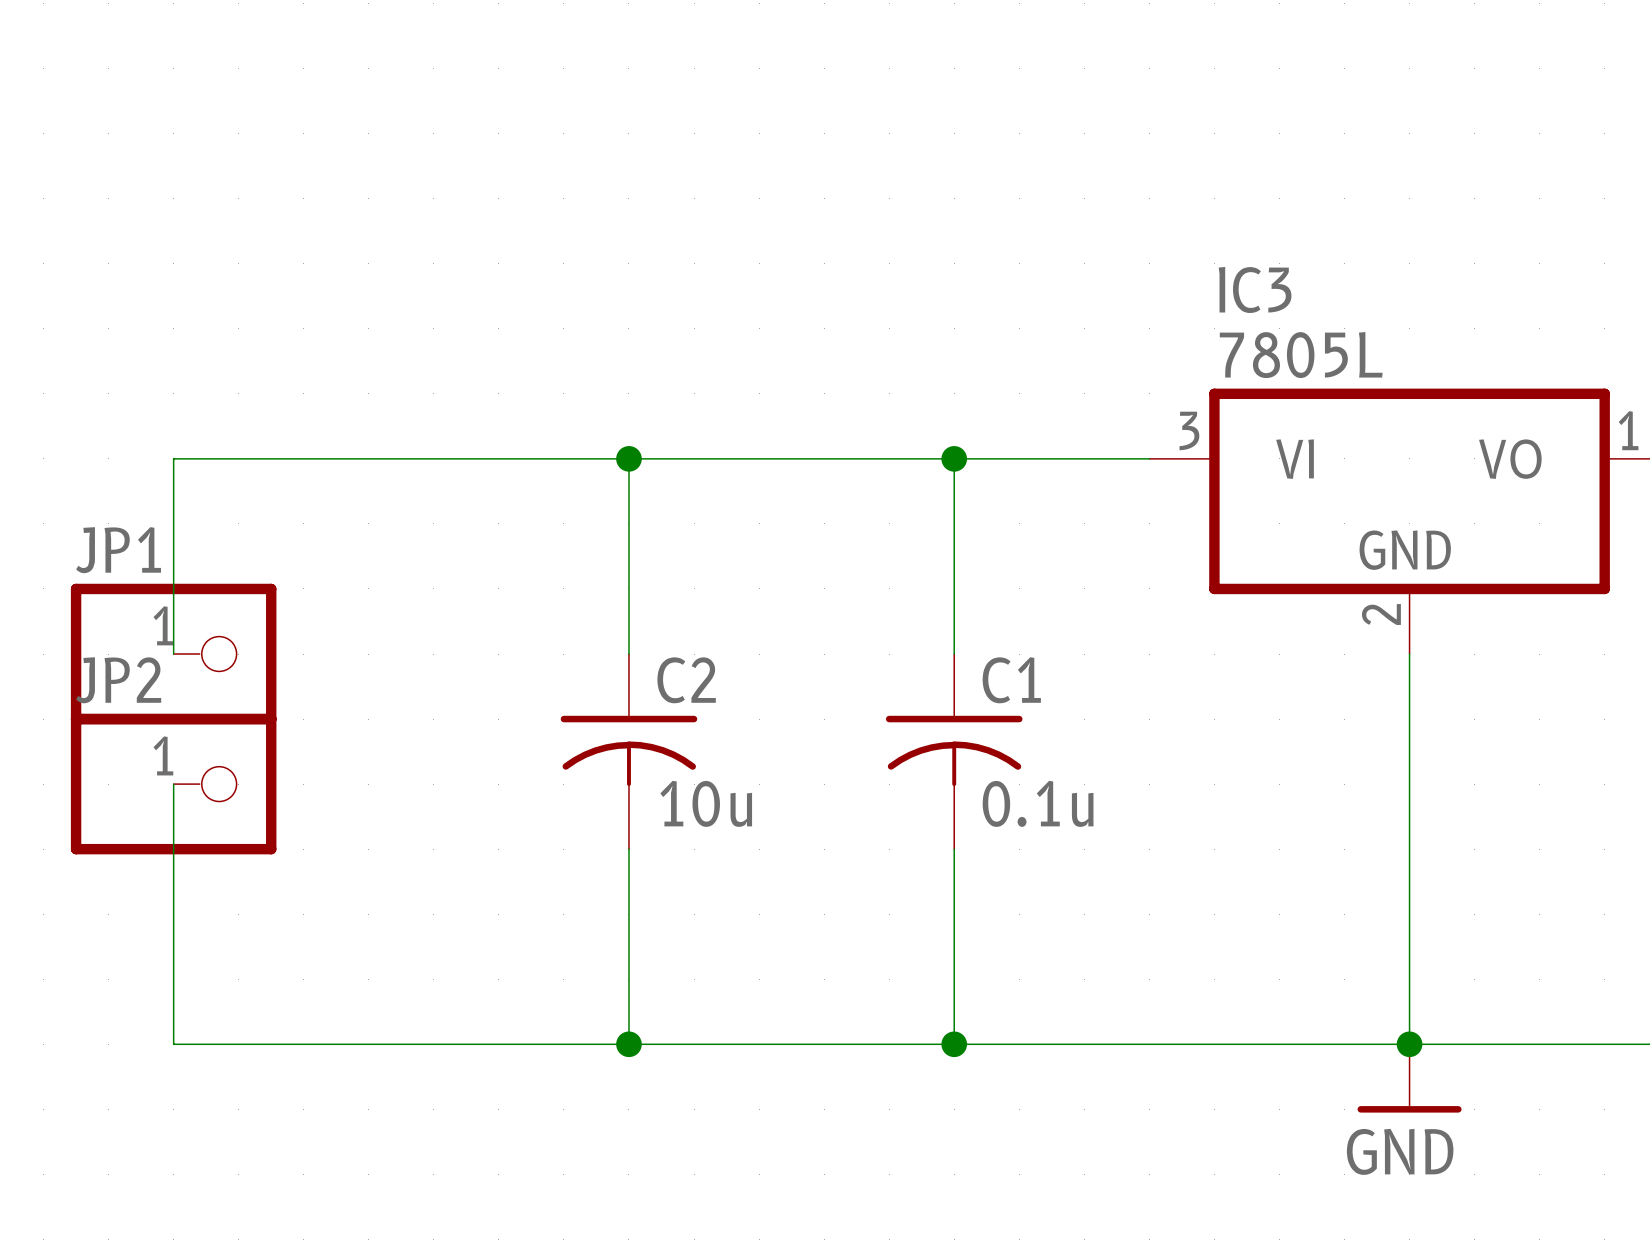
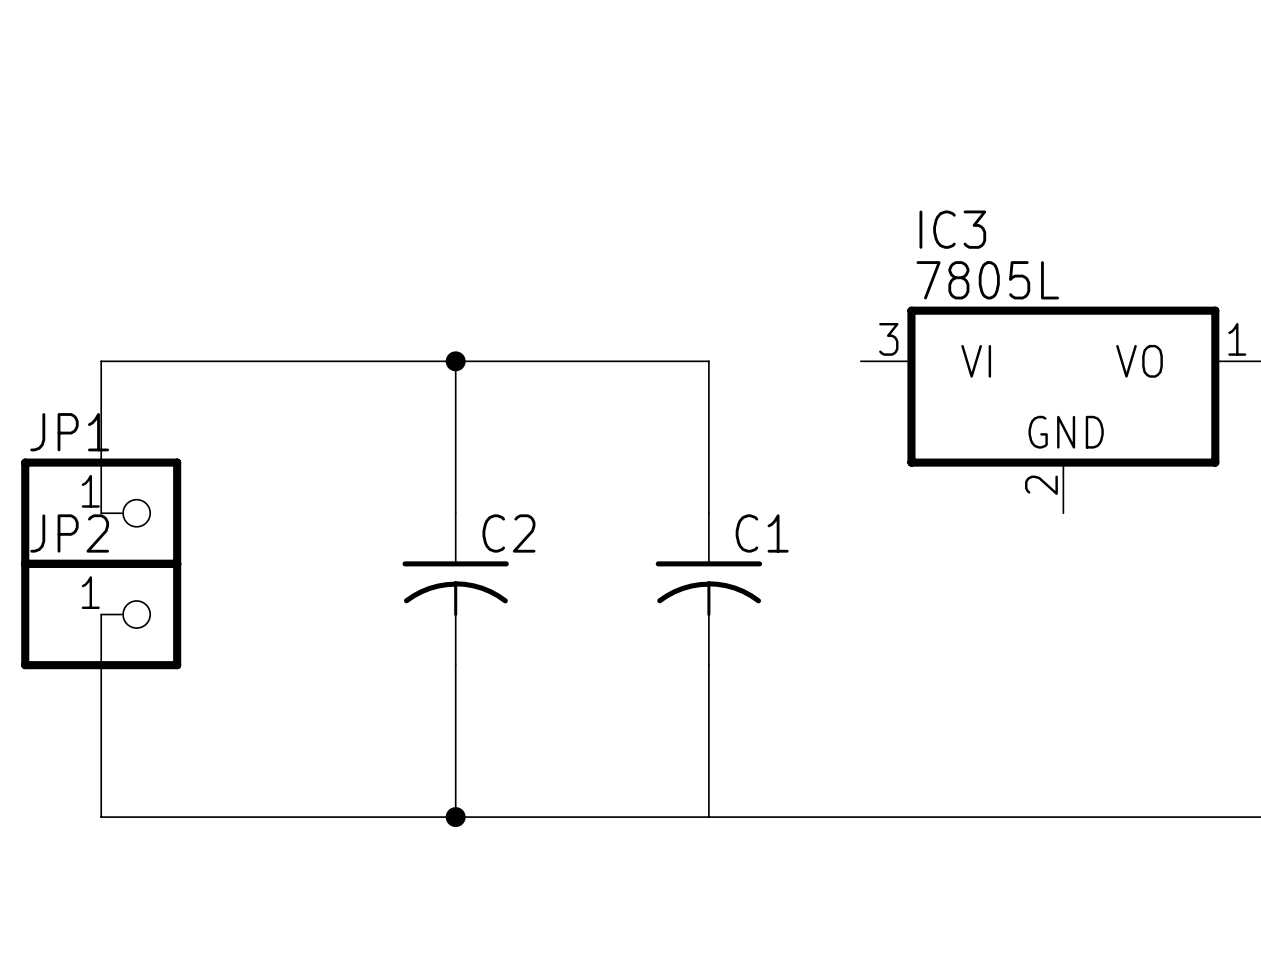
wire: (954, 458) (1149, 458) -> none
junction: (954, 458) -> none
wire: (1409, 654) (1409, 1044) -> none
C2 value: 10u (706, 803) -> none
C1 value: 0.1u (1038, 803) -> none
junction: (954, 1044) -> none
junction: (1409, 1044) -> none
power symbol: GND (1409, 1078) -> none

